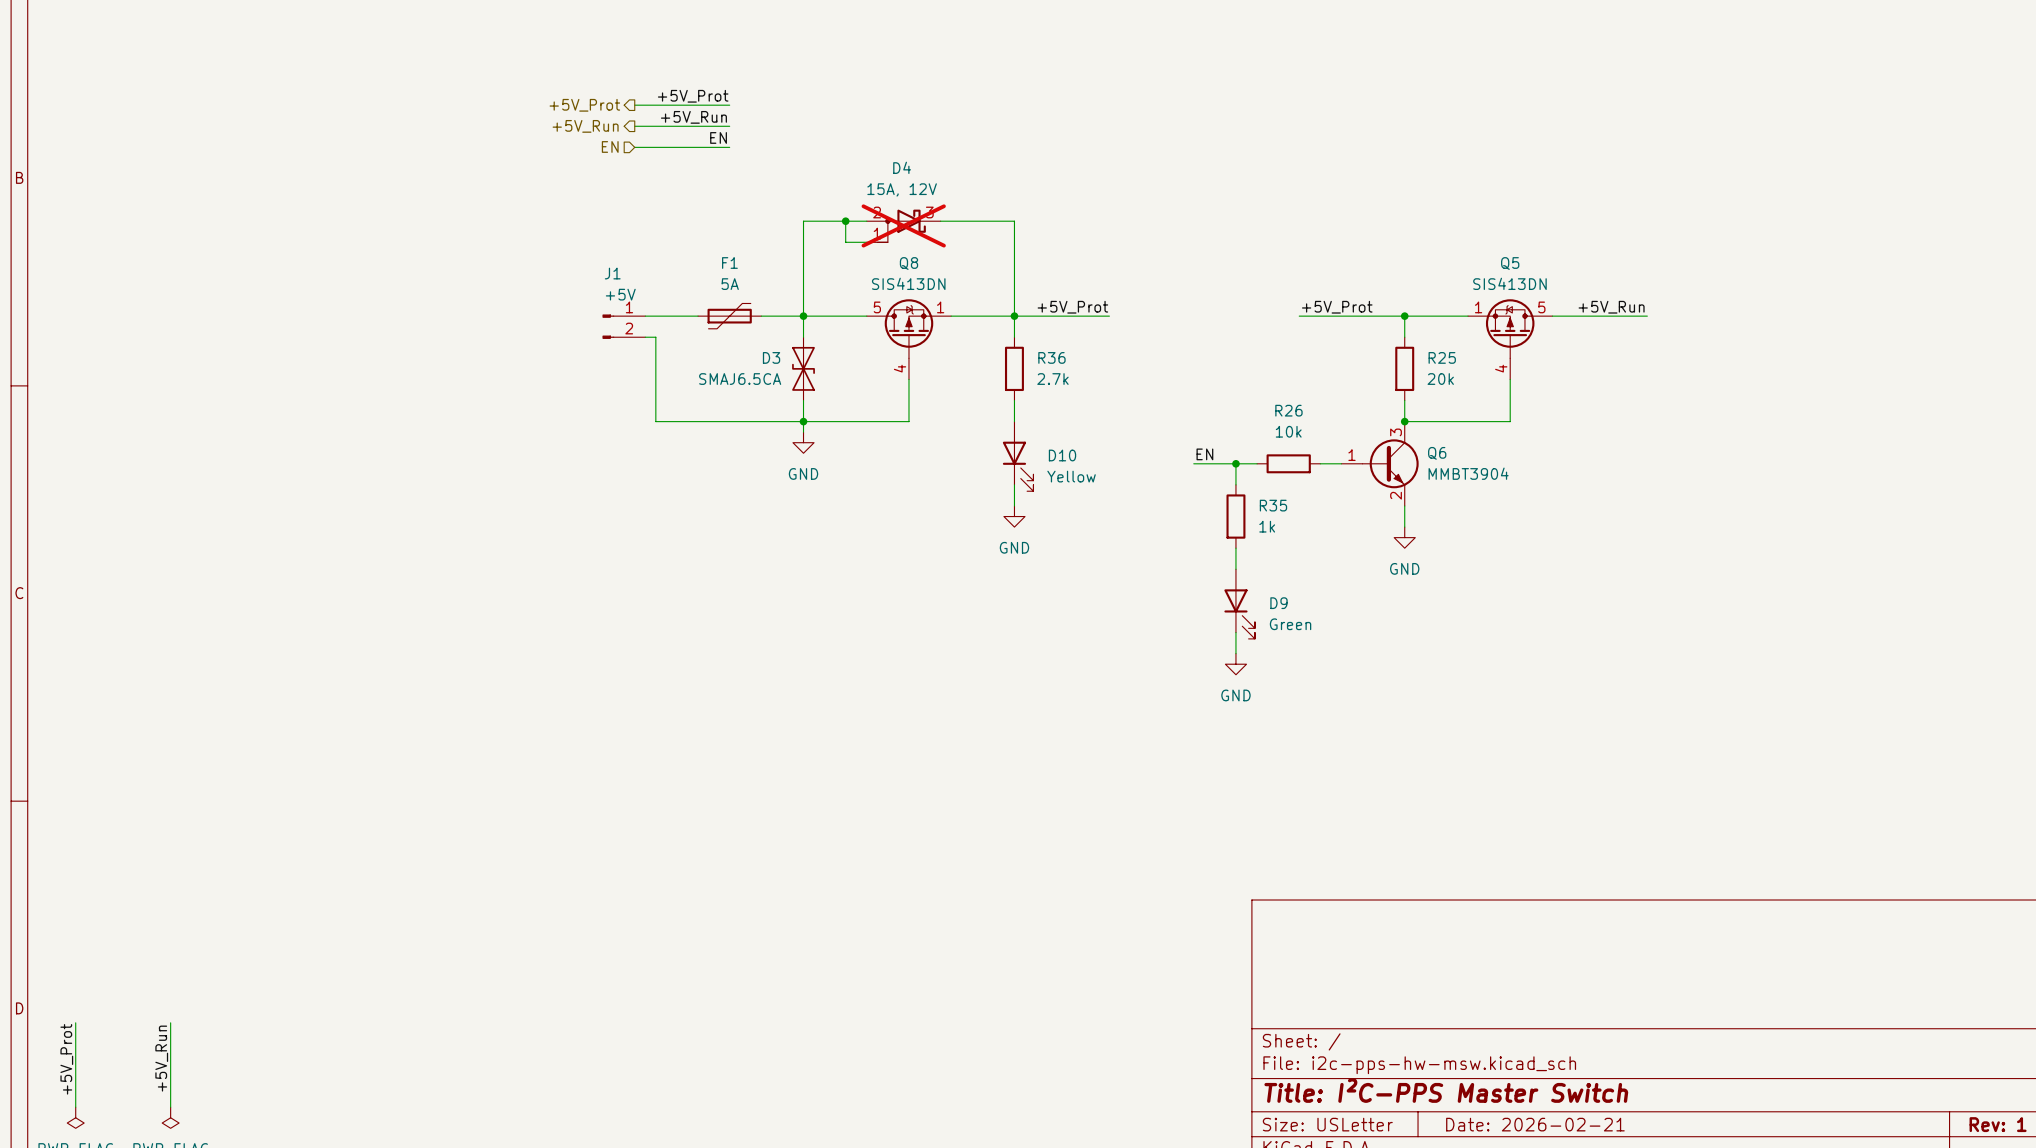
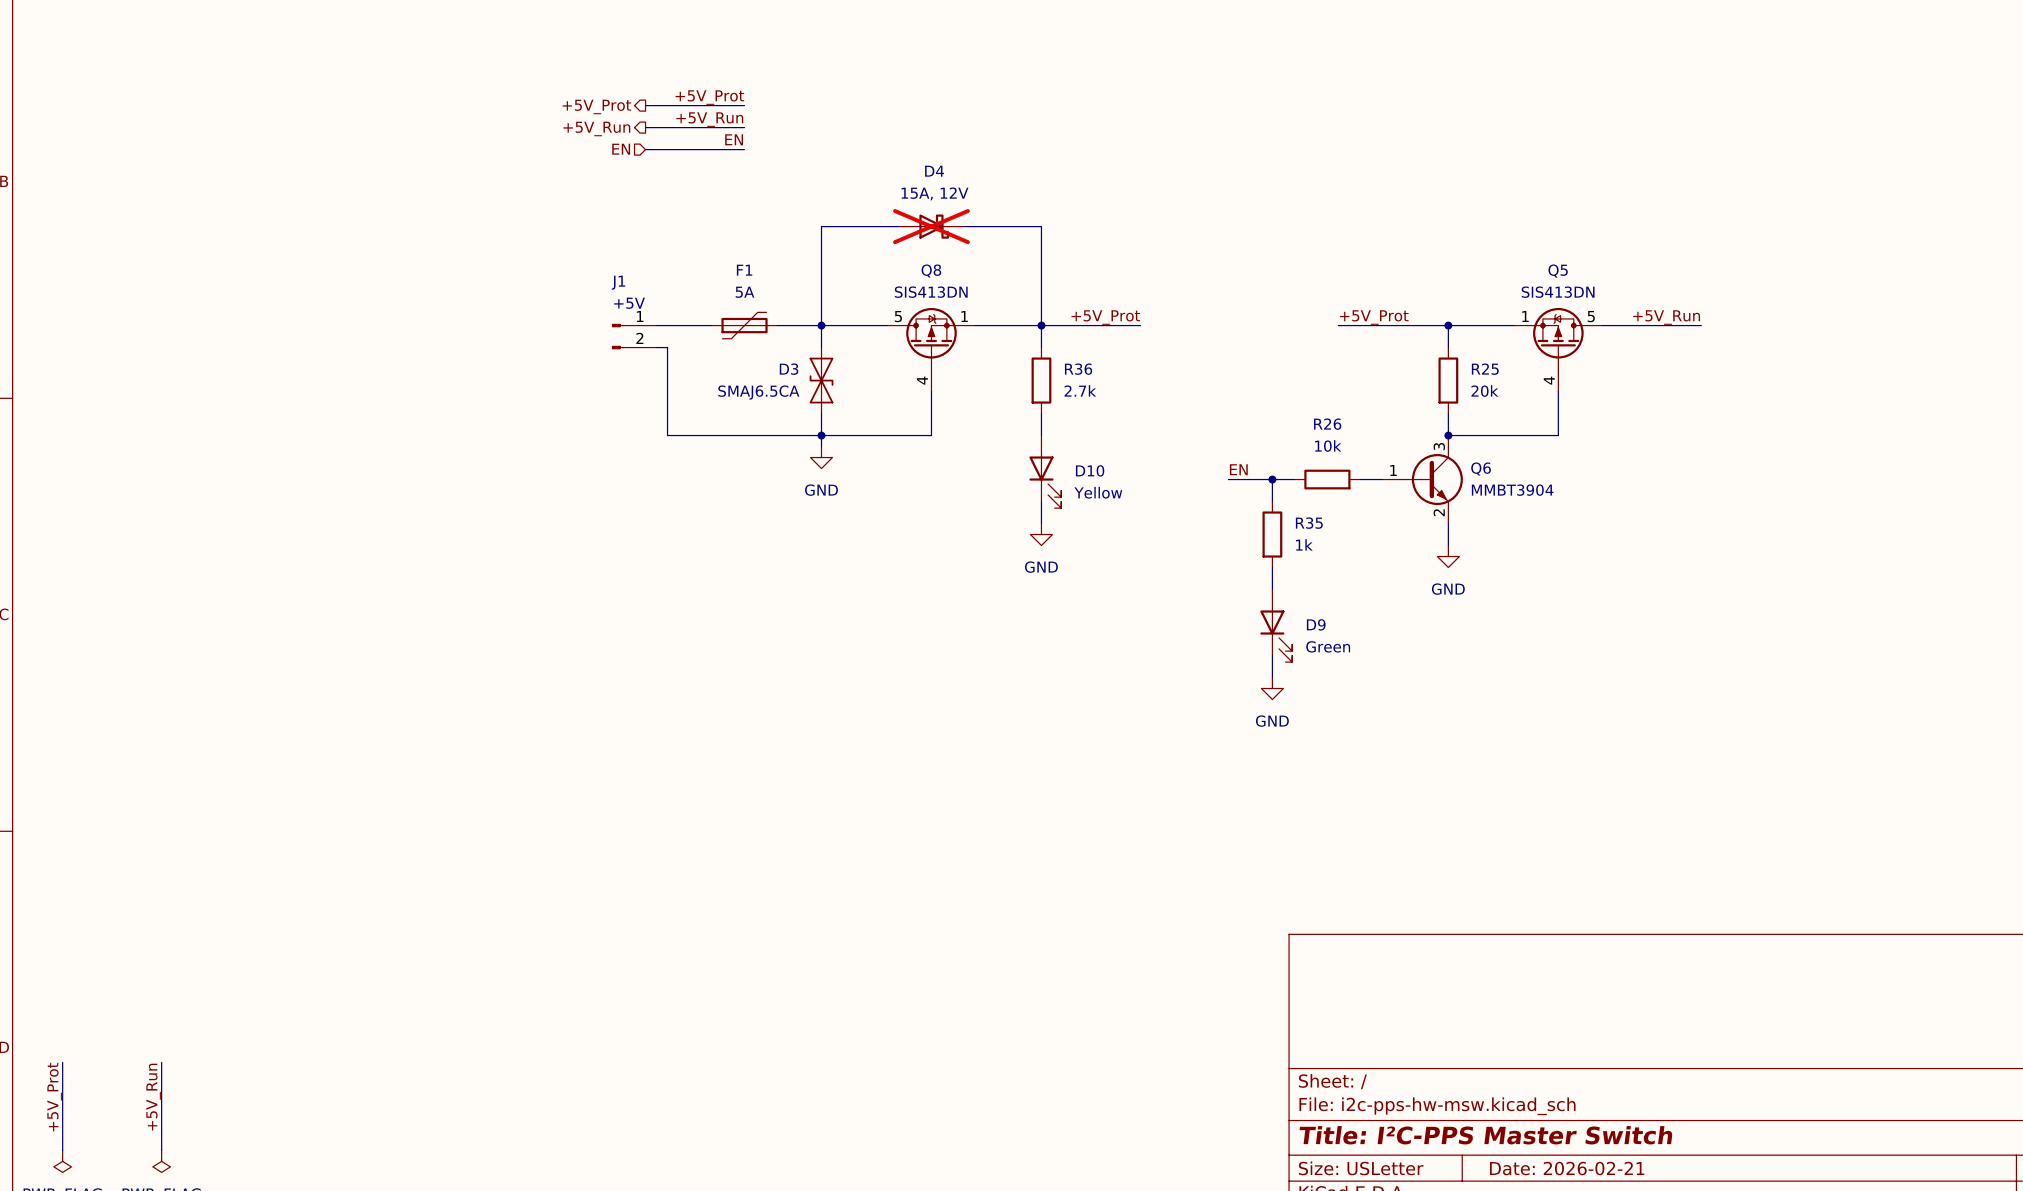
D4 symbol: [866, 209, 941, 243] -> [898, 214, 965, 239]
wire: (845, 221) (845, 242) (866, 242) -> none
junction: (845, 221) -> none

